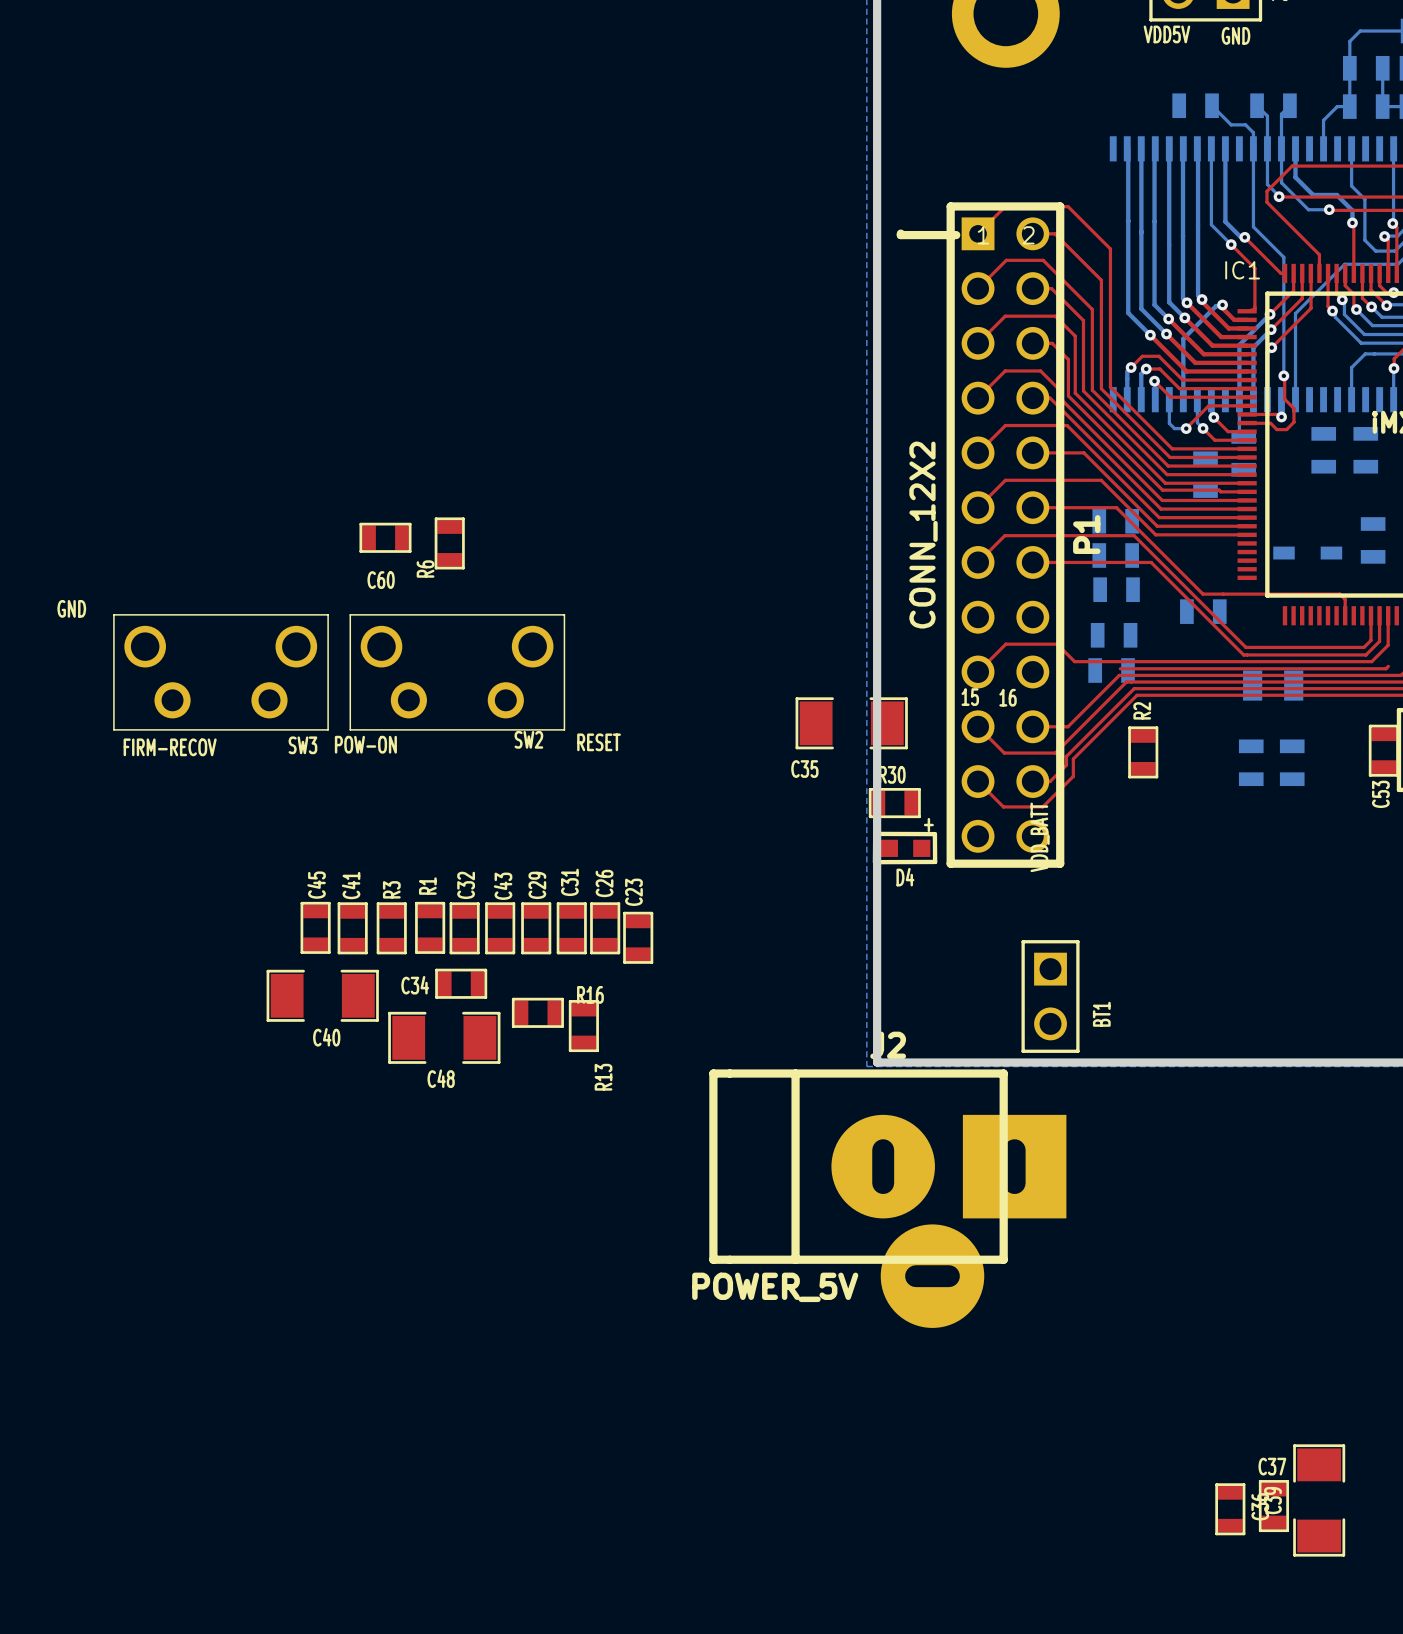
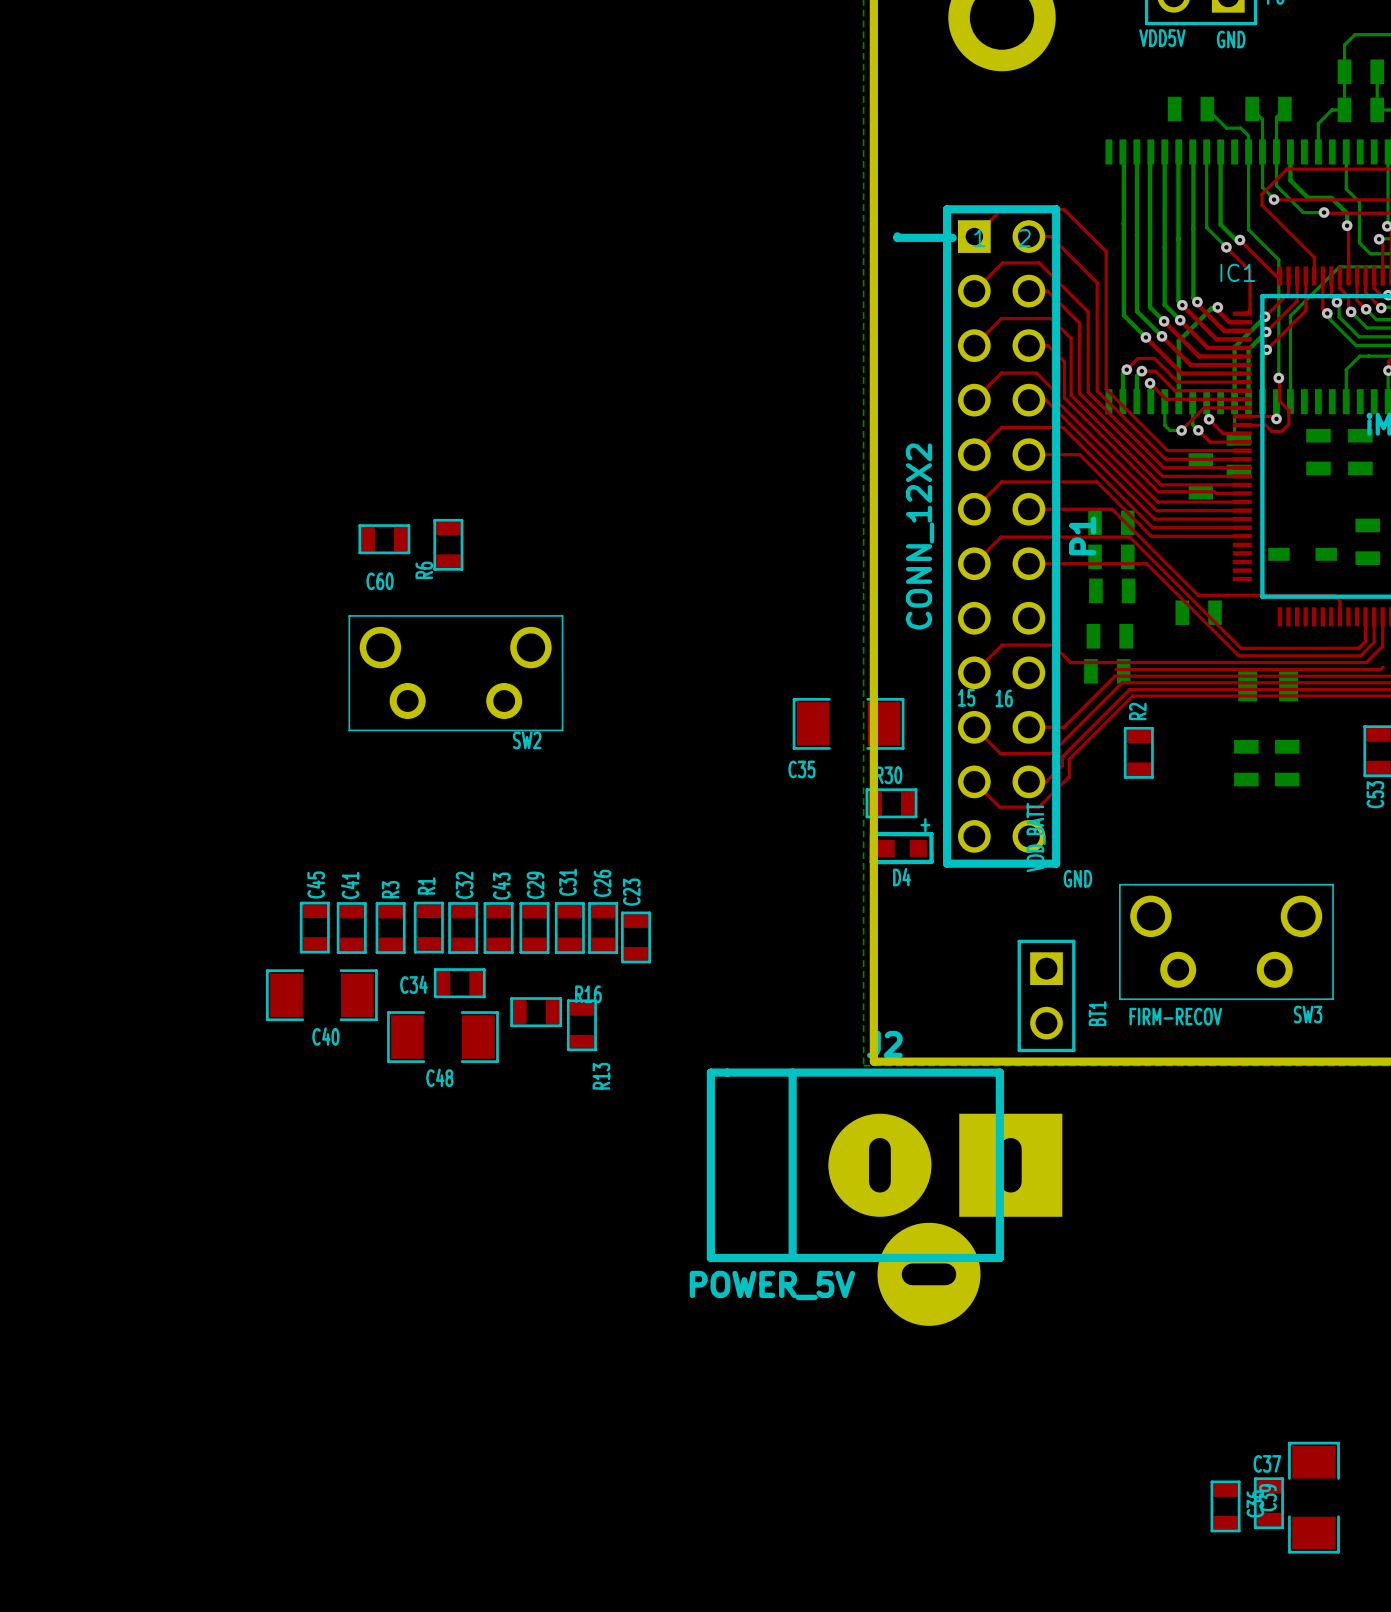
text: GND (71, 608) -> none
SW3 position: (221, 672) -> (1226, 941)
text: RESET (599, 742) -> none
text: POW-ON (365, 744) -> none
text: FIRM-RECOV (170, 747) -> none
text: none -> GND (1077, 878)
text: none -> FIRM-RECOV (1175, 1016)

